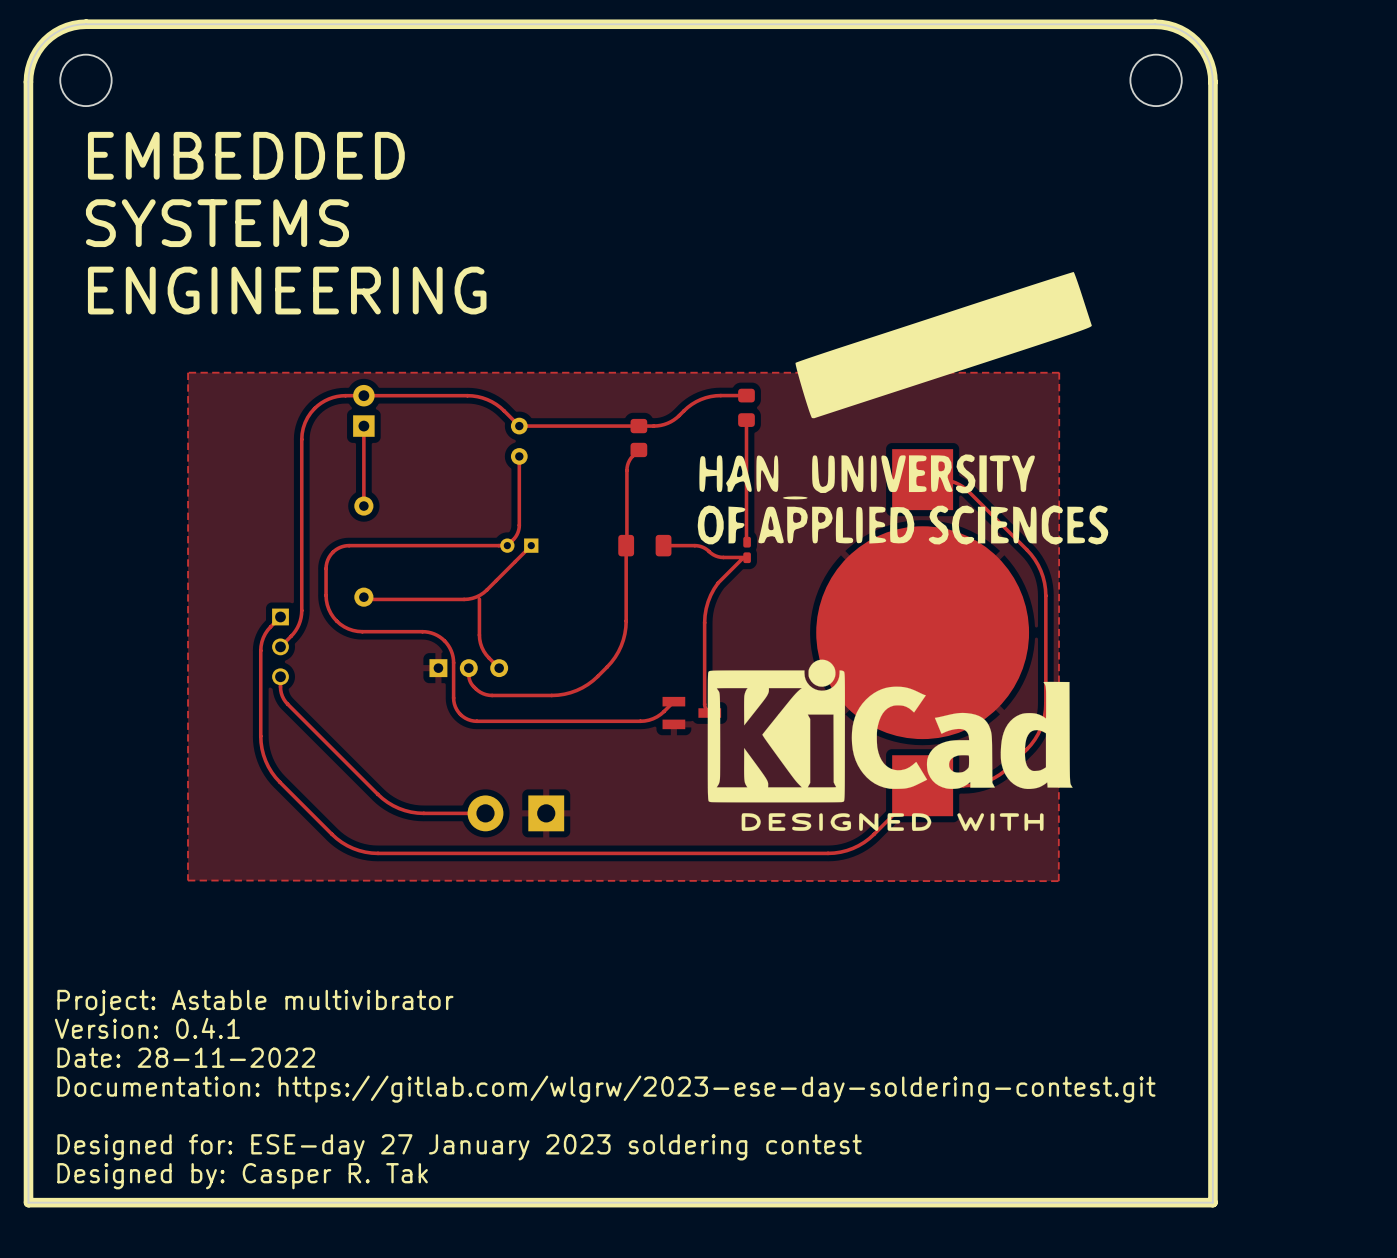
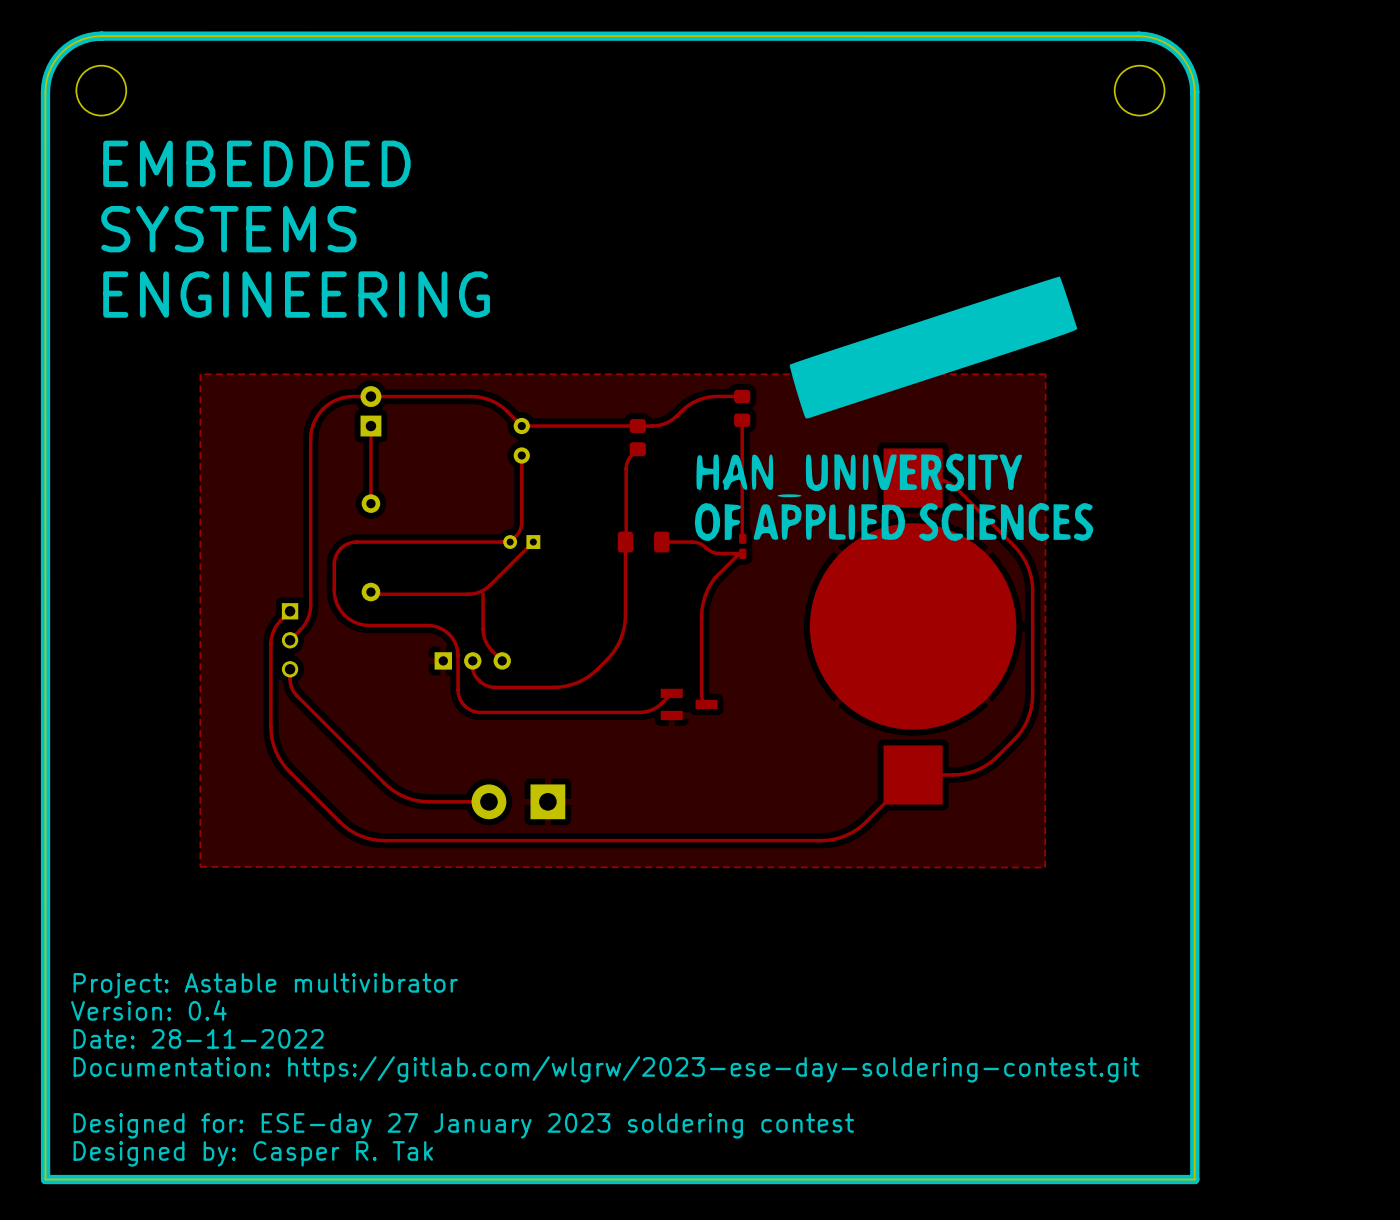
drawing: [707, 659, 1073, 831] -> none
text: Version: 0.4.1 (147, 1028) -> Version: 0.4 (148, 1010)

